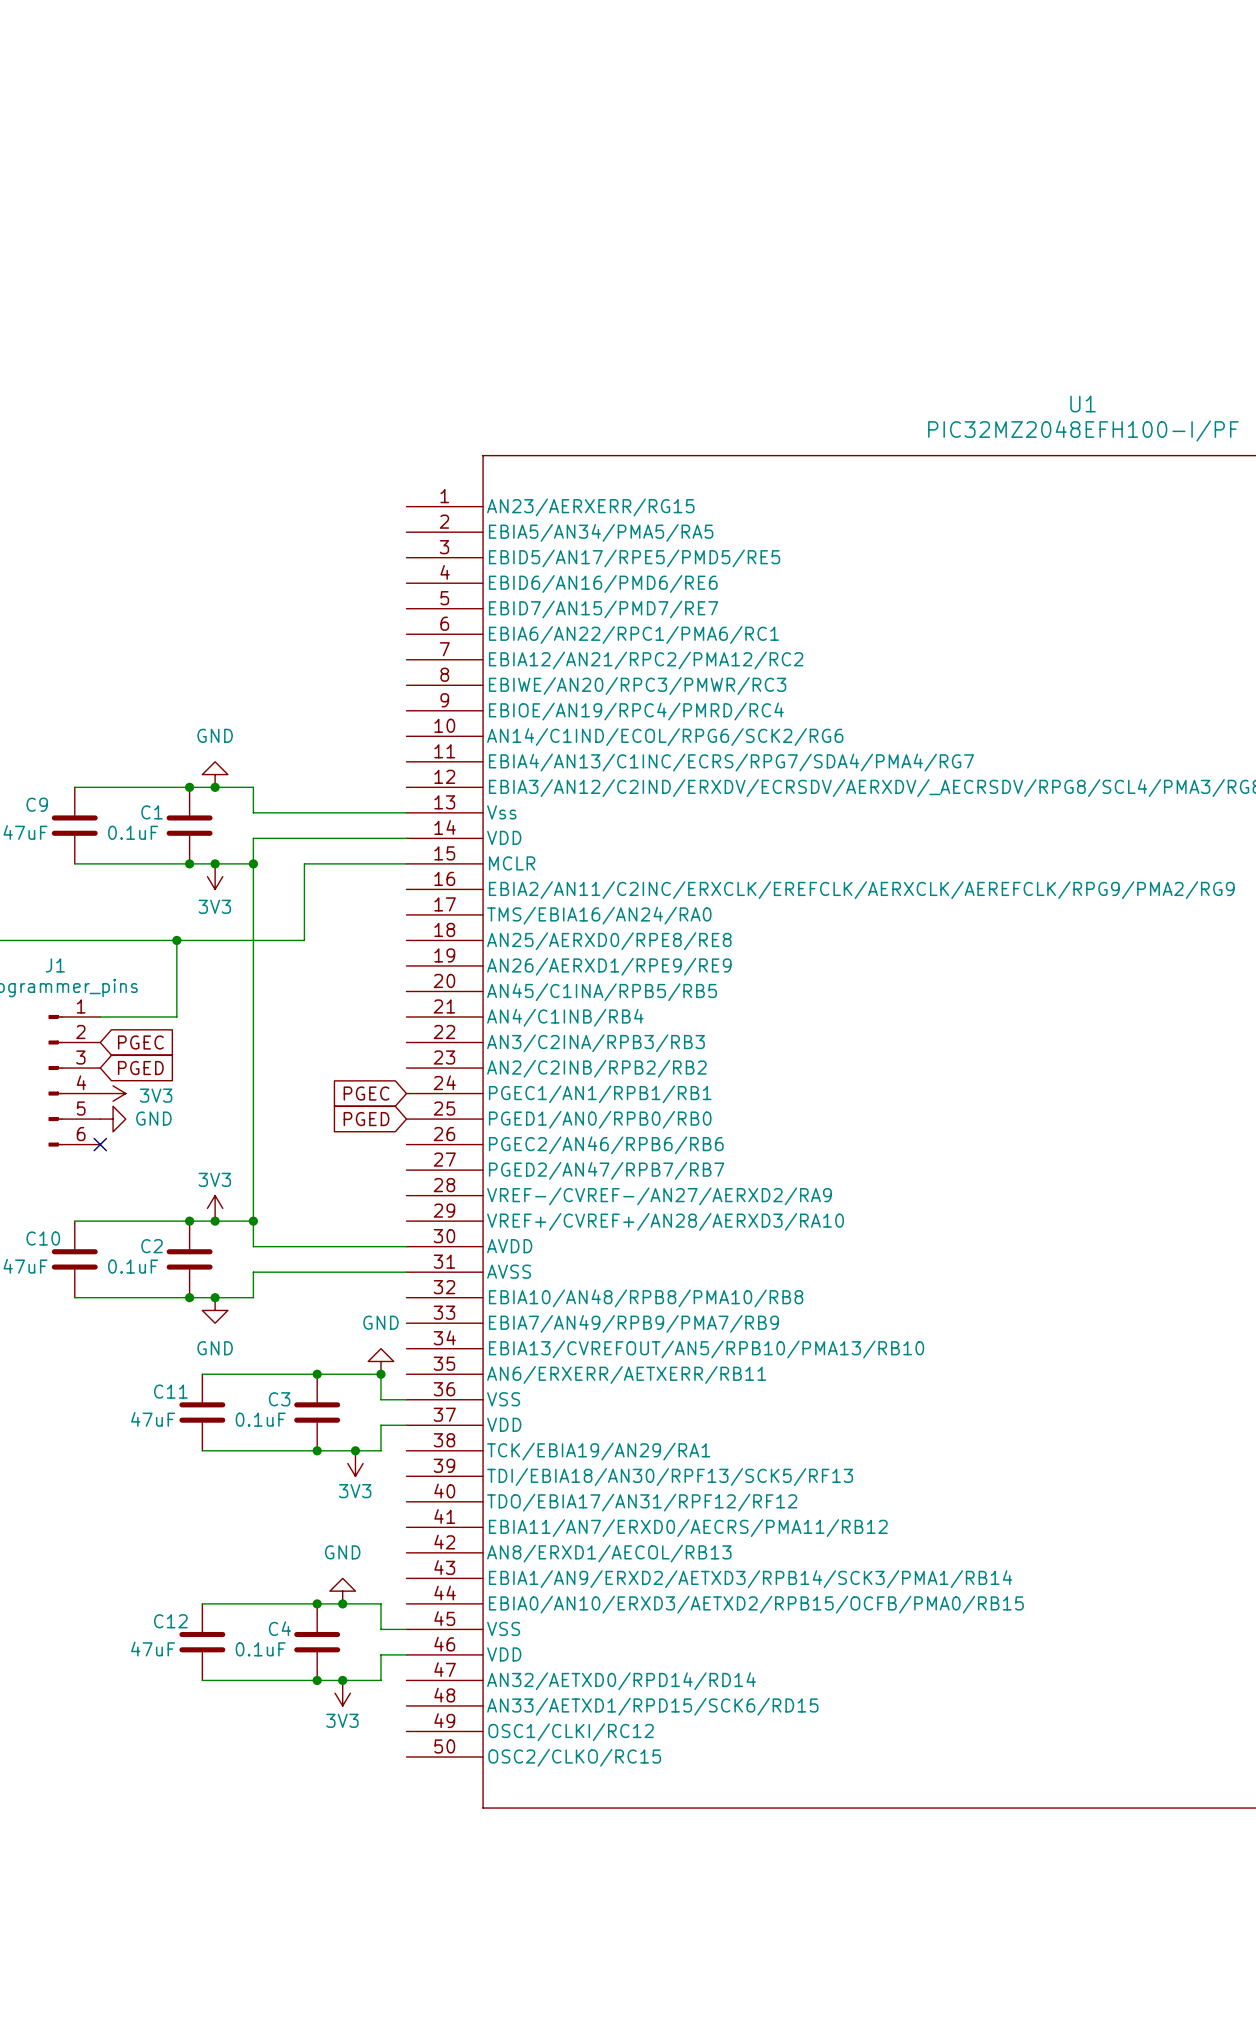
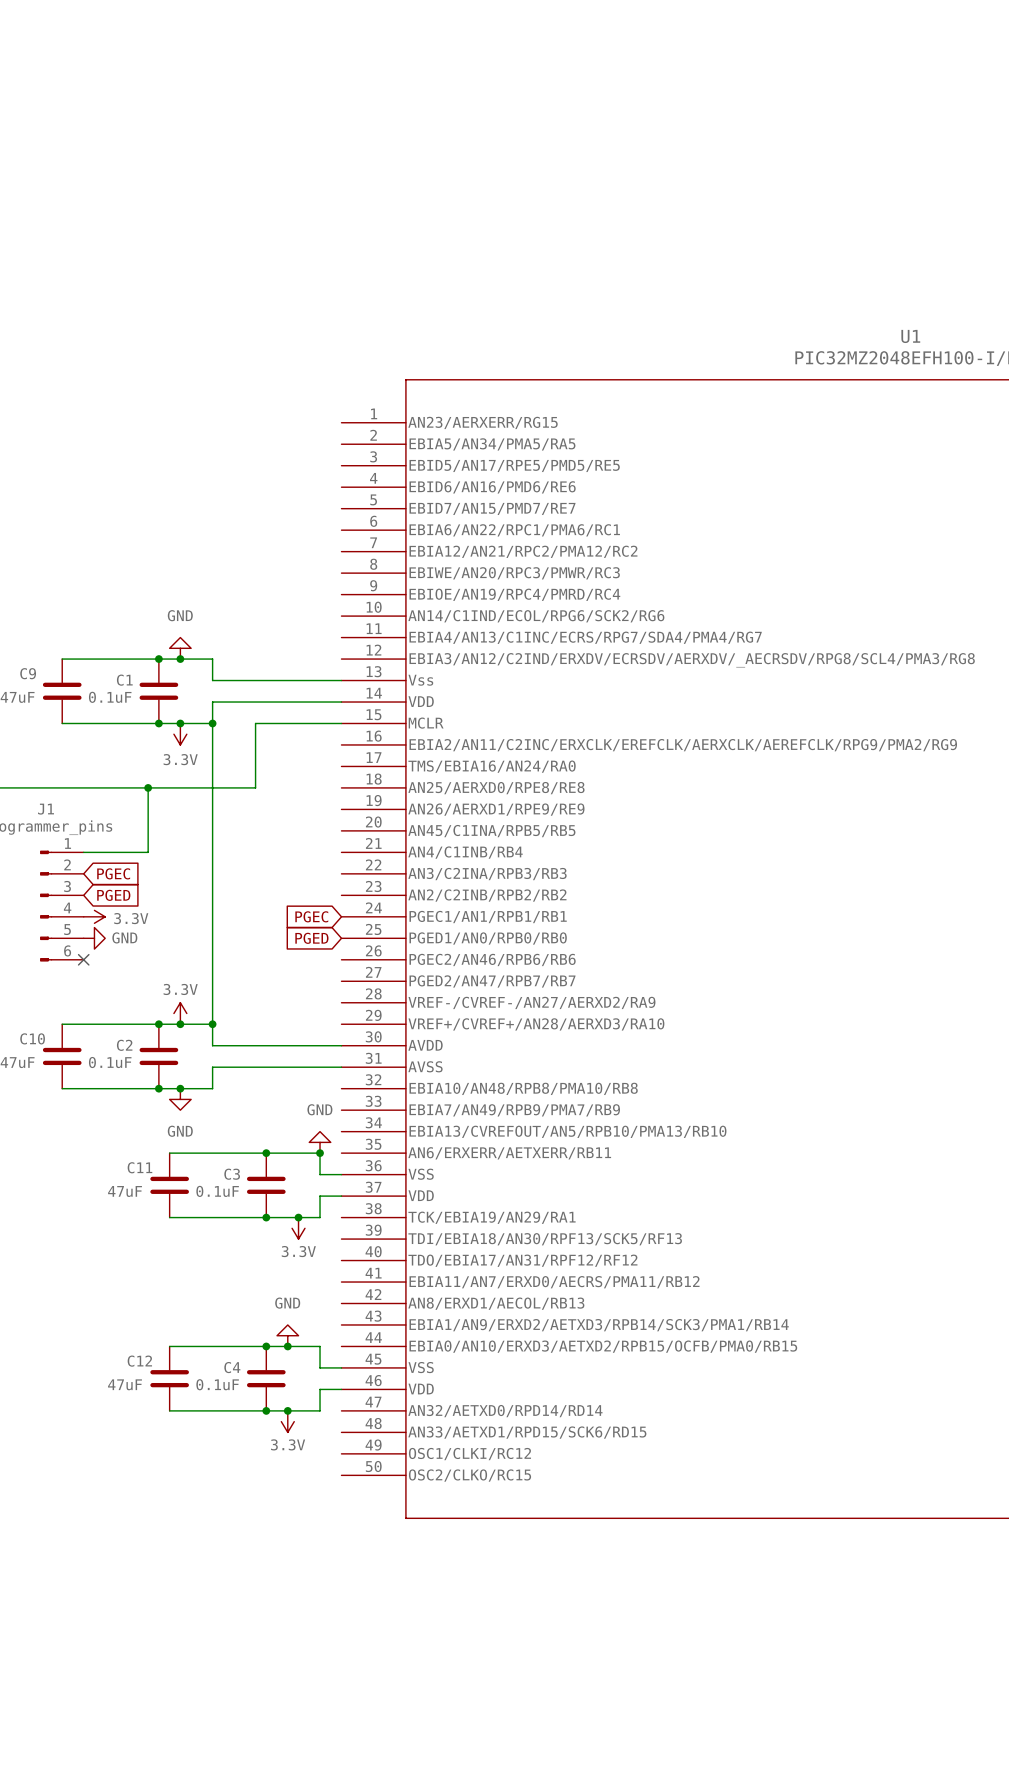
power symbol: 3V3 (215, 876) -> 3.3V (180, 734)
power symbol: 3V3 (113, 1093) -> 3.3V (94, 916)
power symbol: 3V3 (215, 1208) -> 3.3V (180, 1013)
power symbol: 3V3 (355, 1463) -> 3.3V (298, 1228)
power symbol: 3V3 (342, 1693) -> 3.3V (287, 1421)

